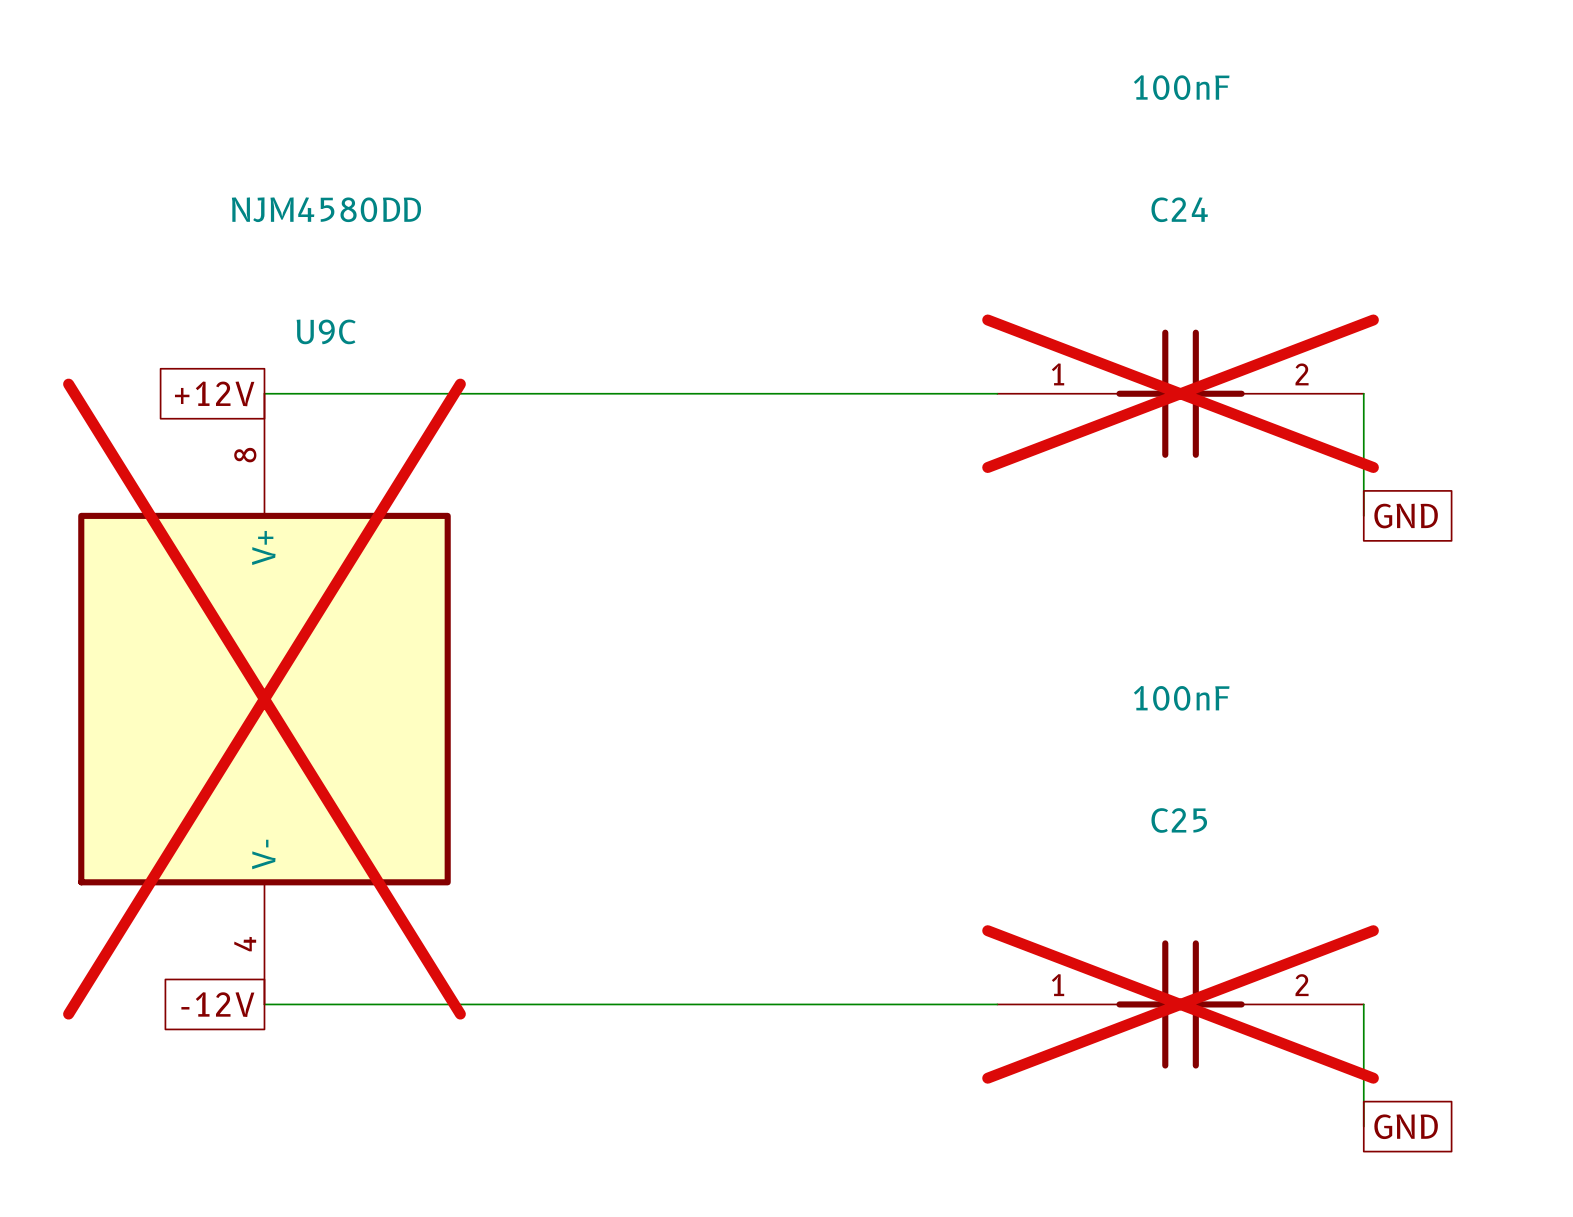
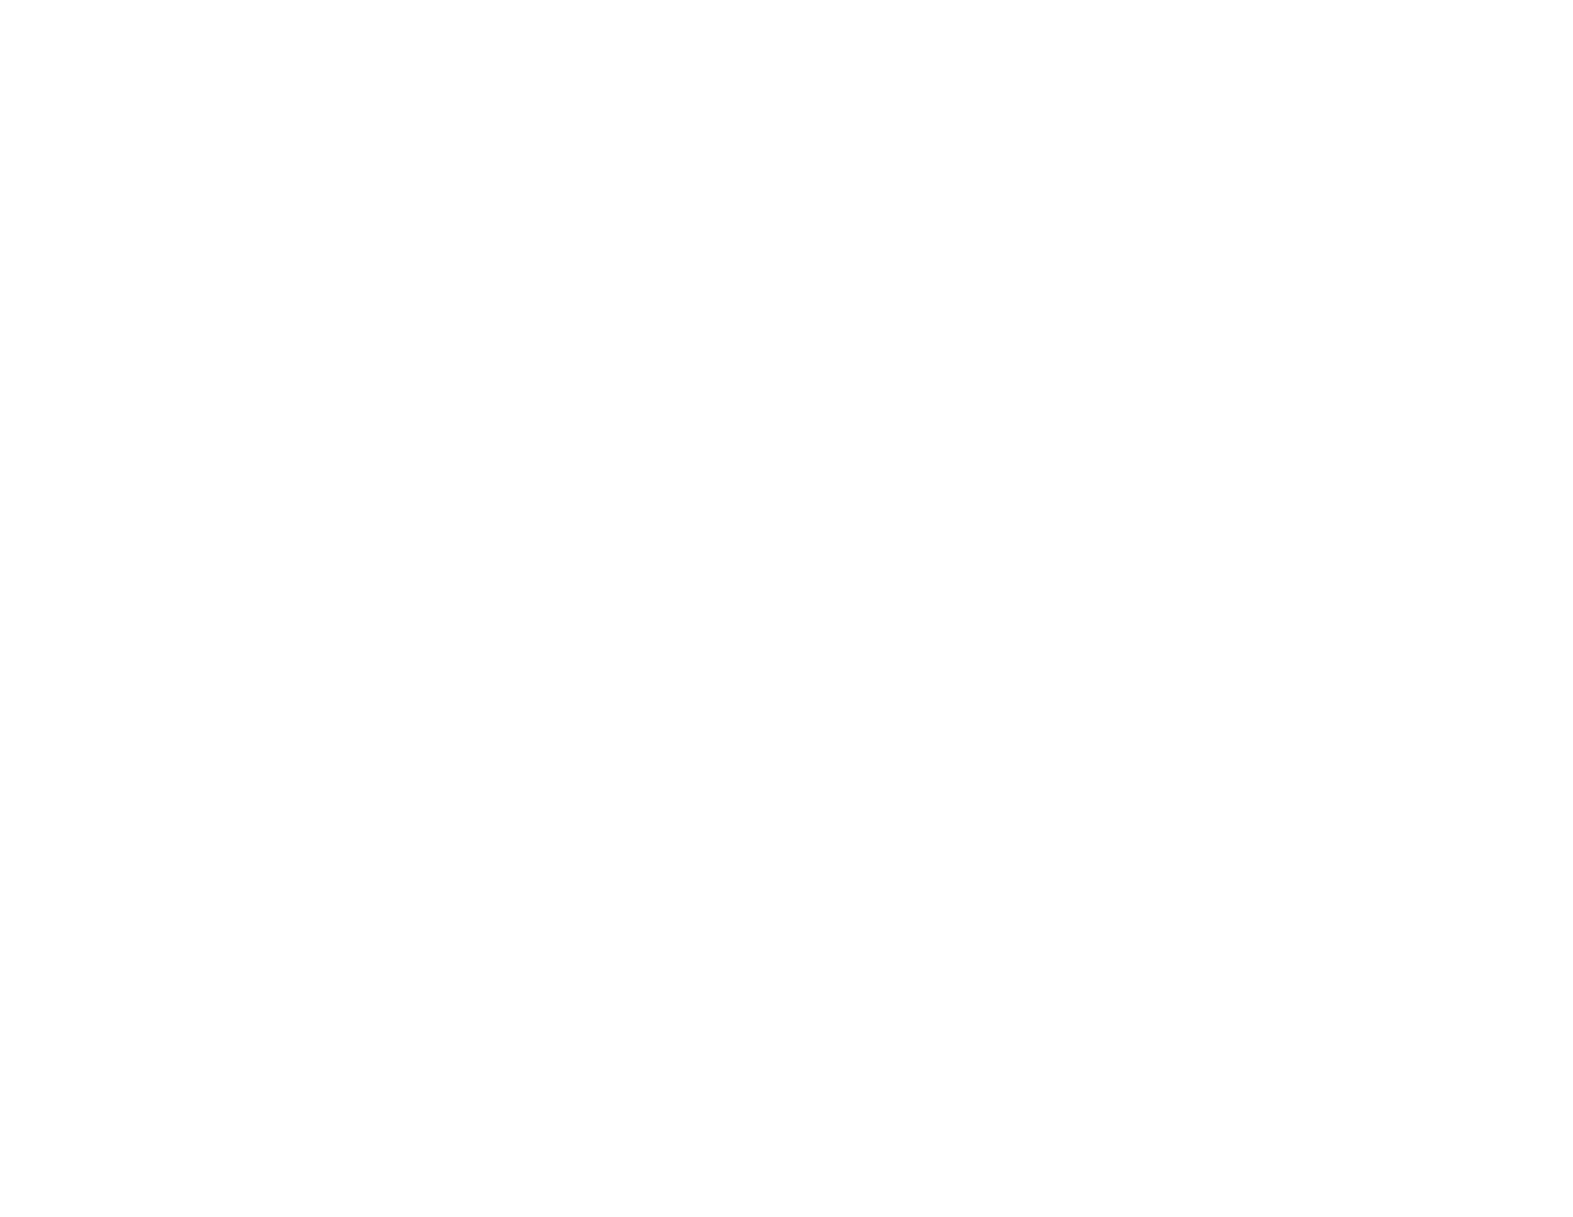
global label: +12V (214, 393) -> none
wire: (264, 393) (997, 393) -> none
C24: 100nF (1180, 393) -> none
wire: (1363, 393) (1363, 515) -> none
global label: GND (1406, 516) -> none
U9C: NJM4580DD (264, 699) -> none
global label: -12V (217, 1004) -> none
wire: (264, 1004) (997, 1004) -> none
C25: 100nF (1180, 1004) -> none
wire: (1363, 1004) (1363, 1126) -> none
global label: GND (1406, 1126) -> none

